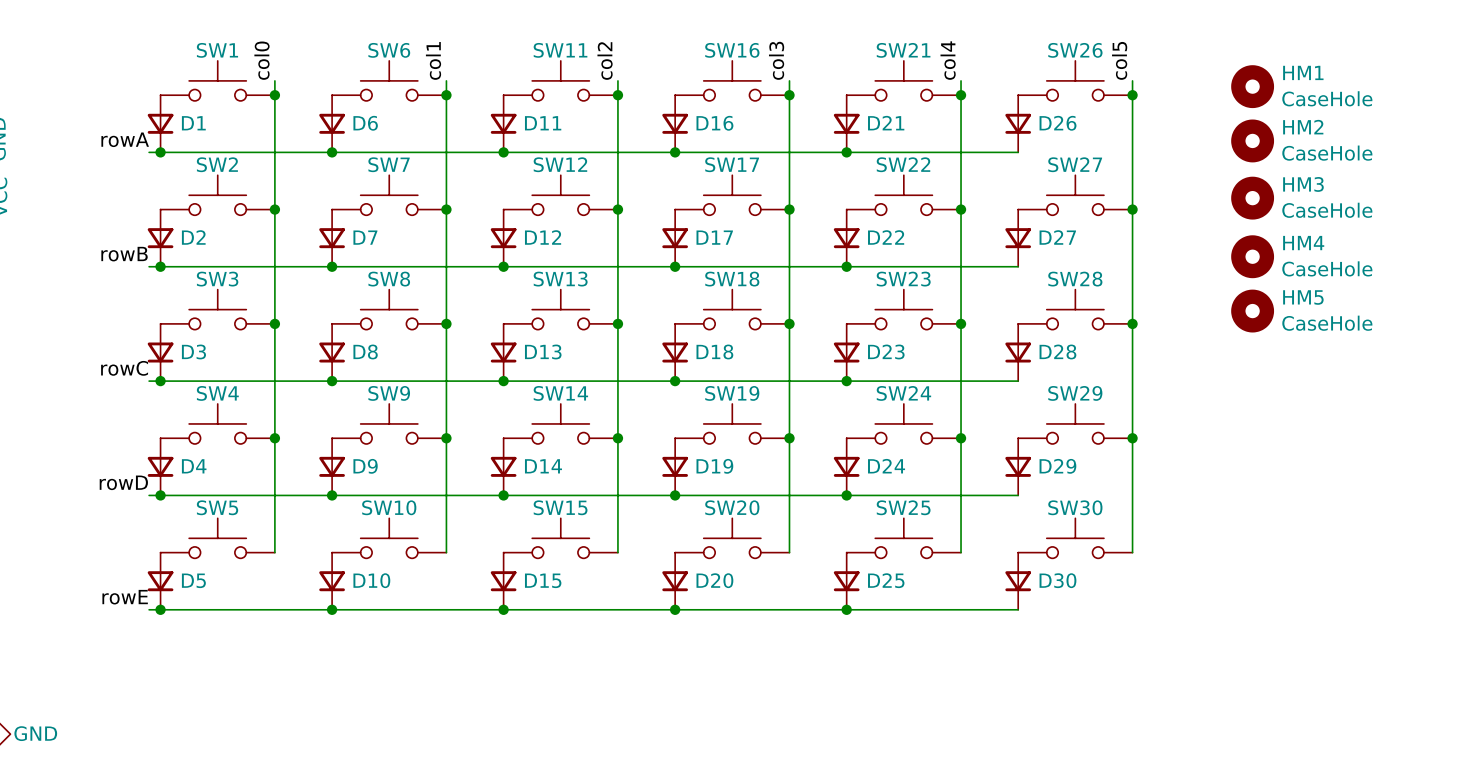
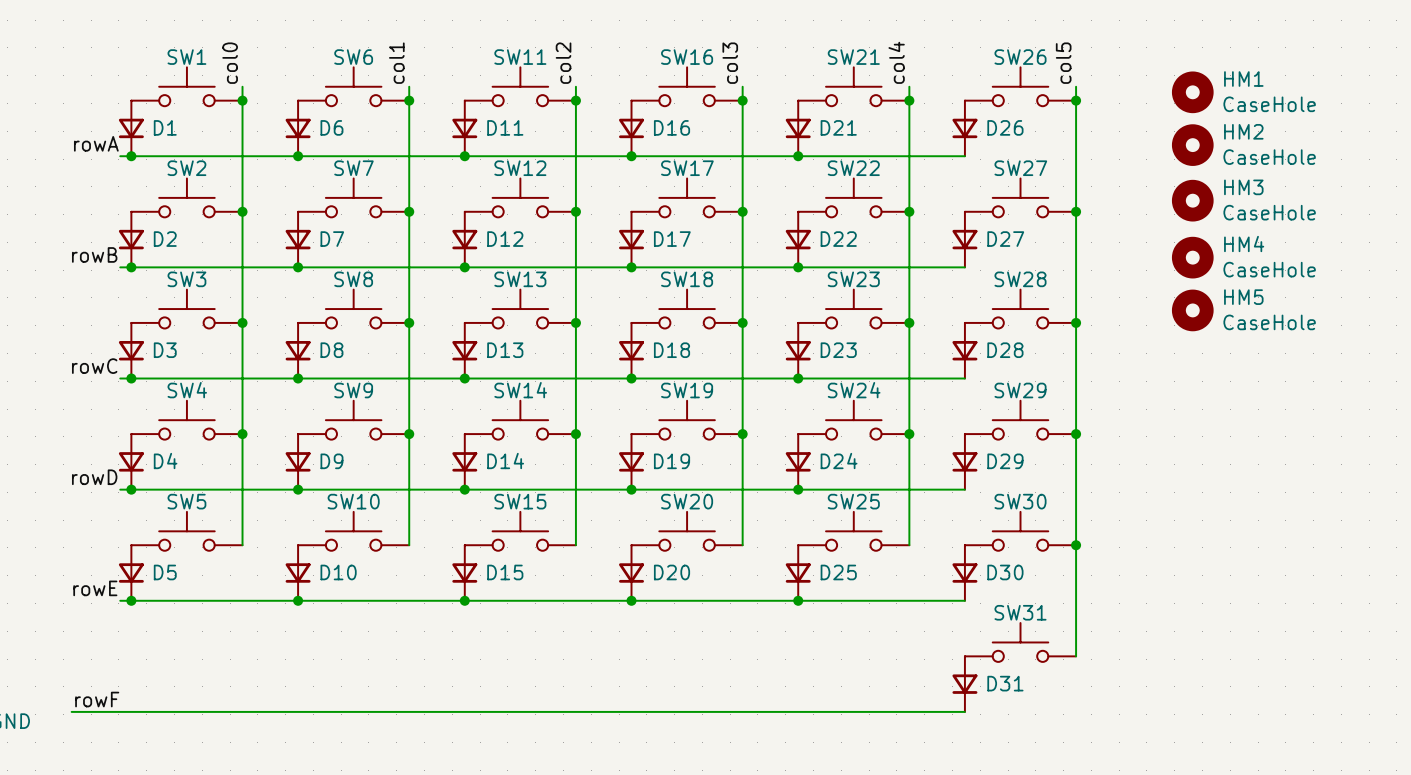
wire: none -> (1076, 545) (1076, 656)
junction: none -> (1076, 545)
SW31: none -> (1020, 642)
D31: none -> (964, 684)
label: none -> rowF (97, 699)
wire: none -> (71, 711) (964, 711)

